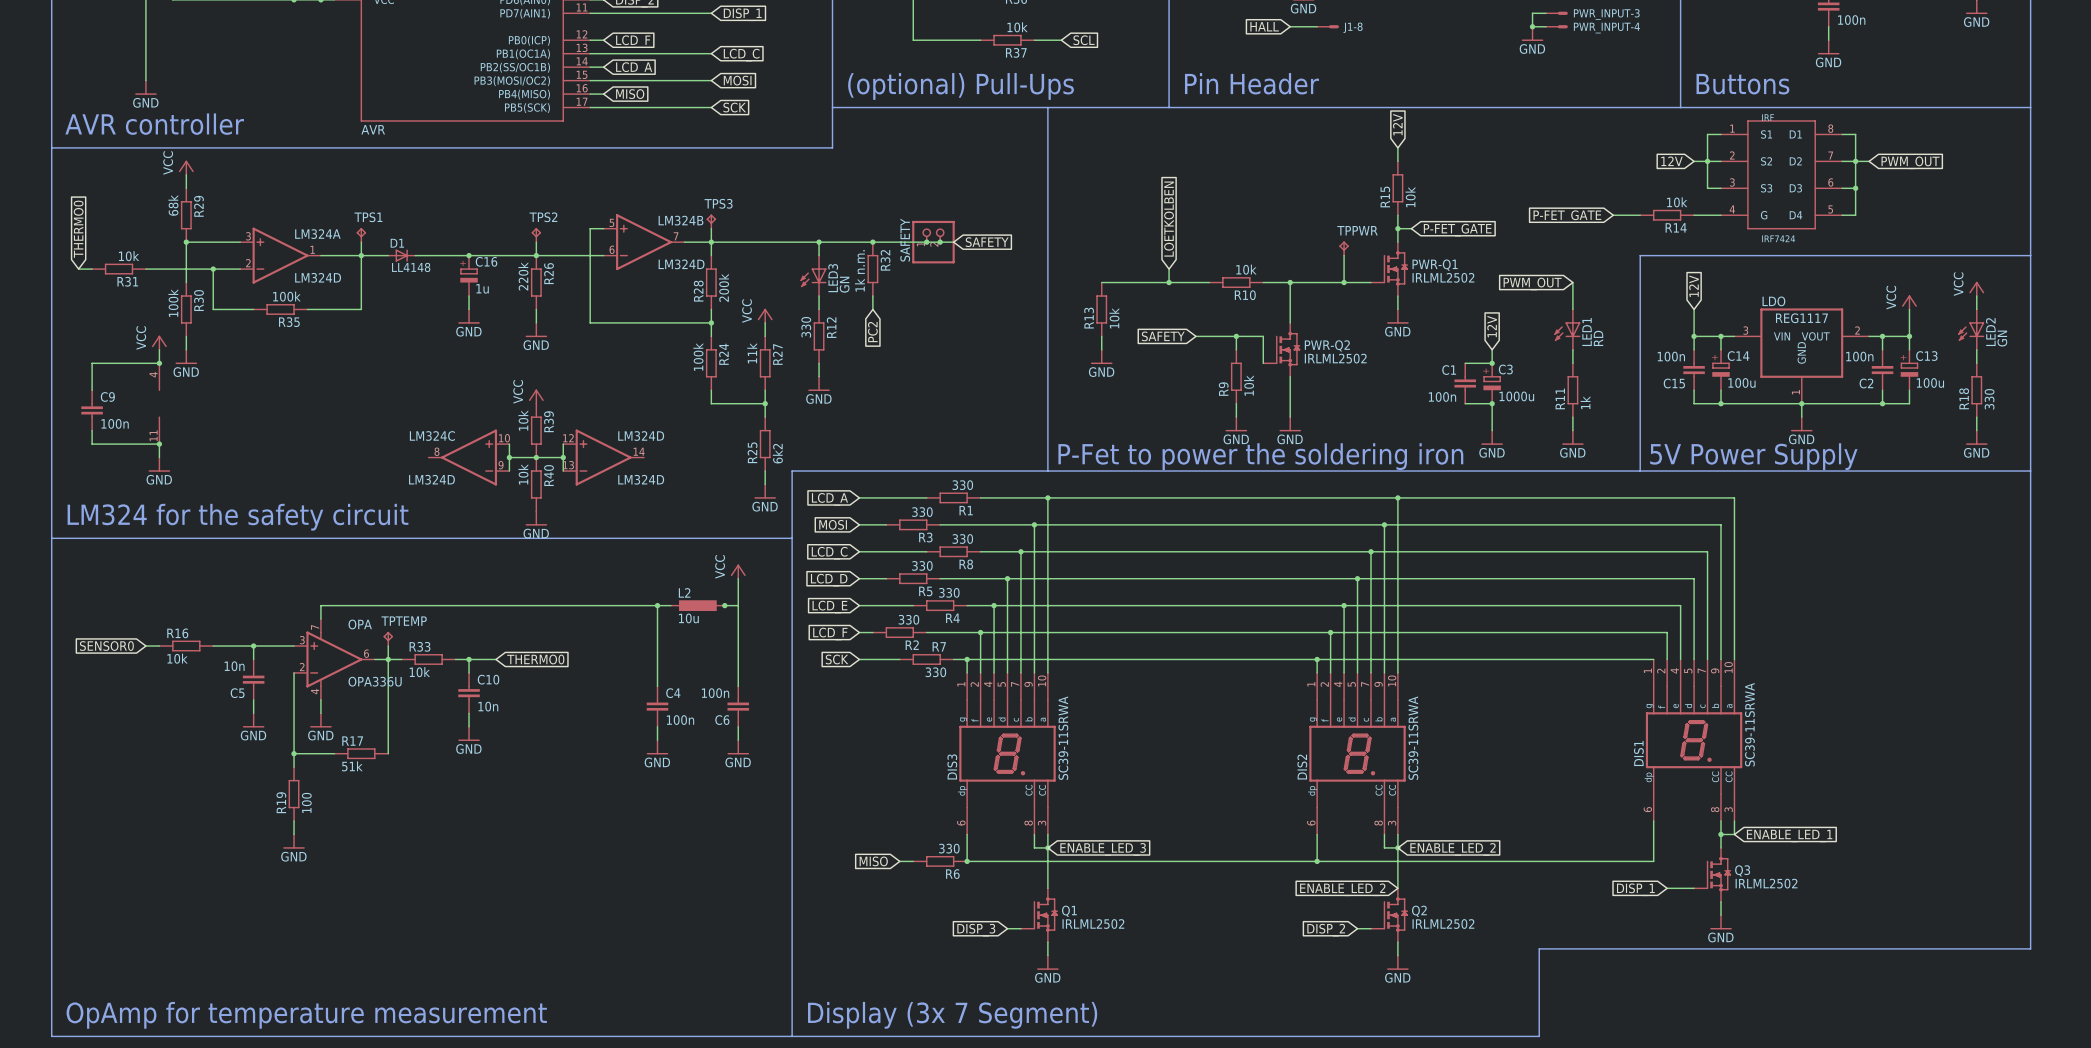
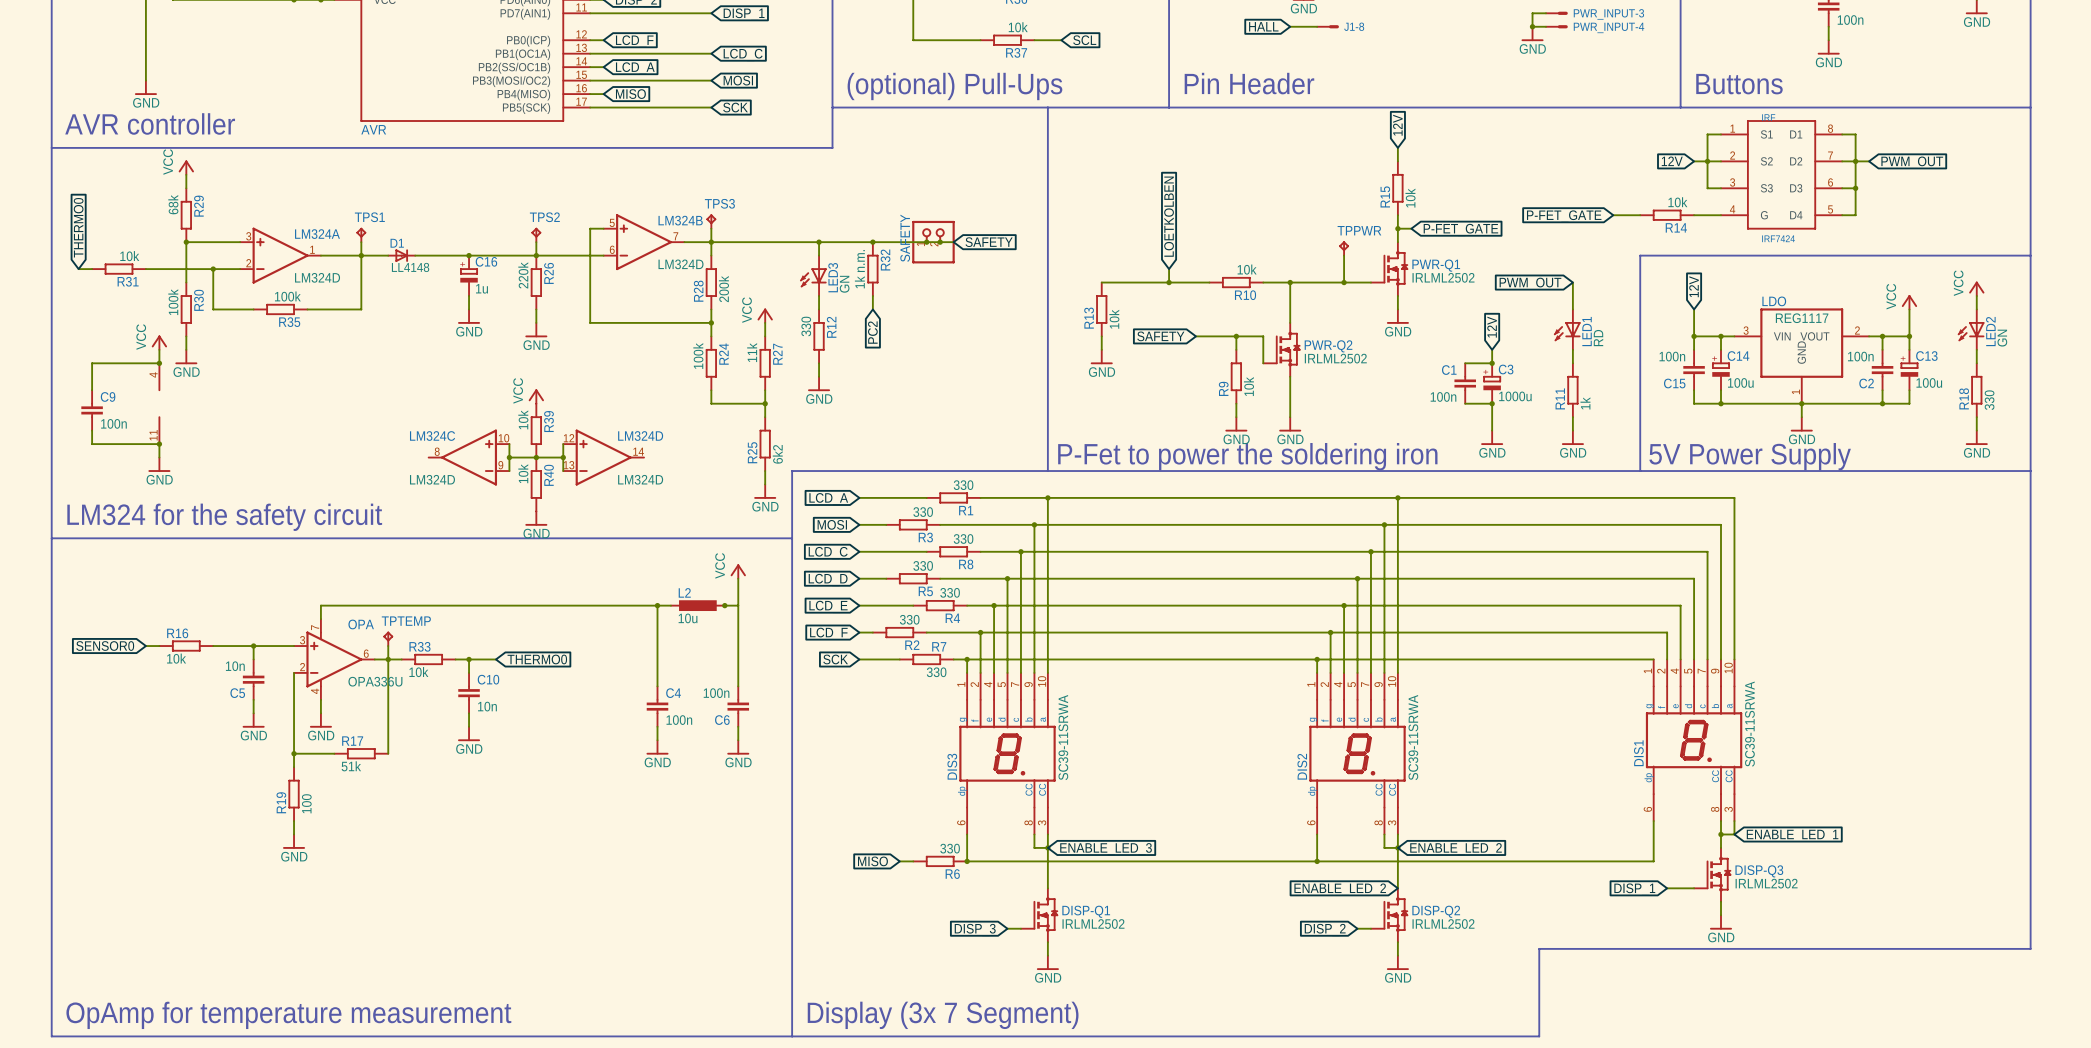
Q3 name: Q3 (1742, 870) -> DISP-Q3 (1759, 871)
Q1 name: Q1 (1069, 911) -> DISP-Q1 (1086, 911)
Q2 name: Q2 (1419, 911) -> DISP-Q2 (1436, 911)

